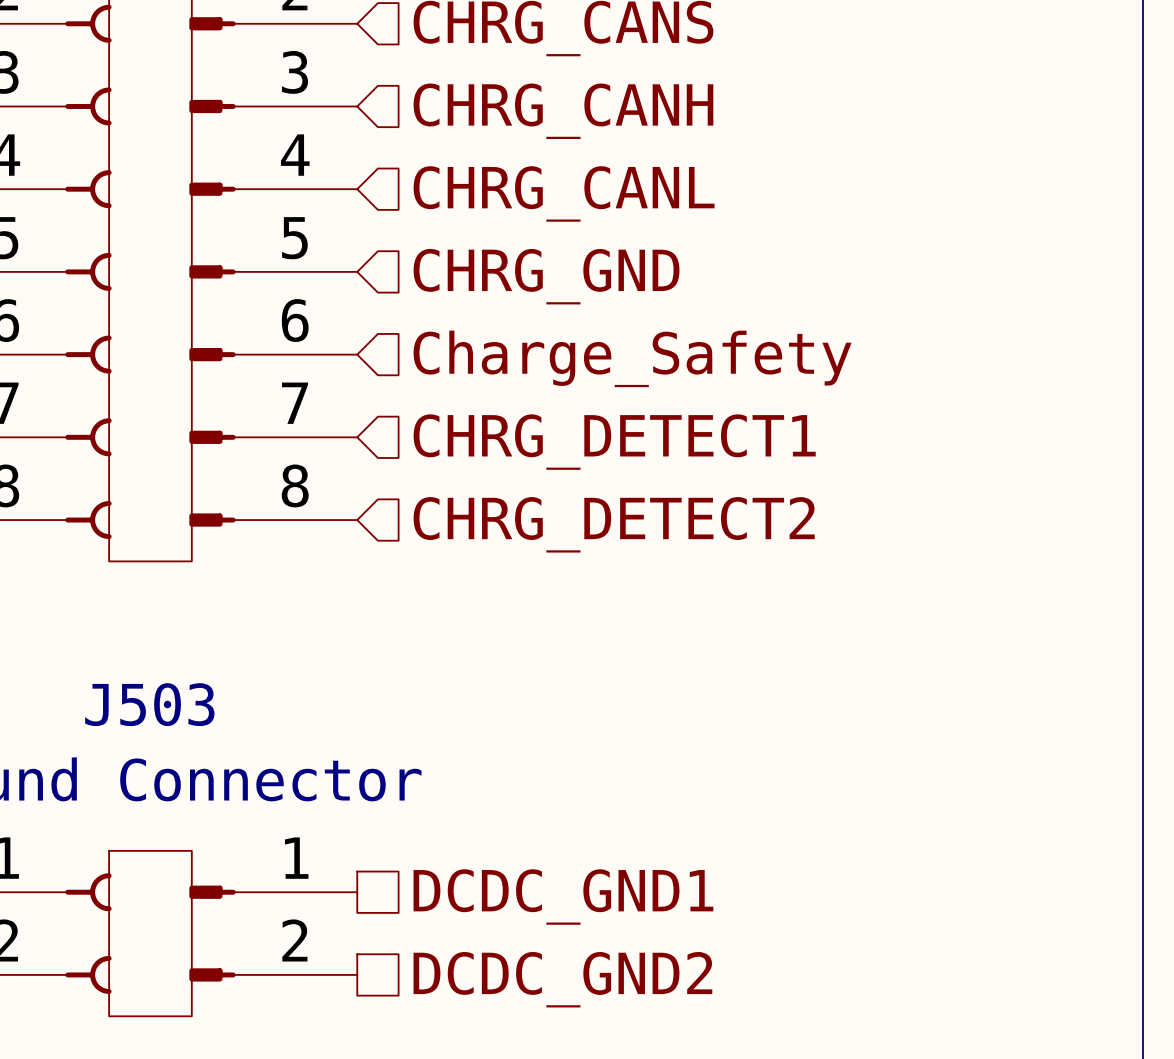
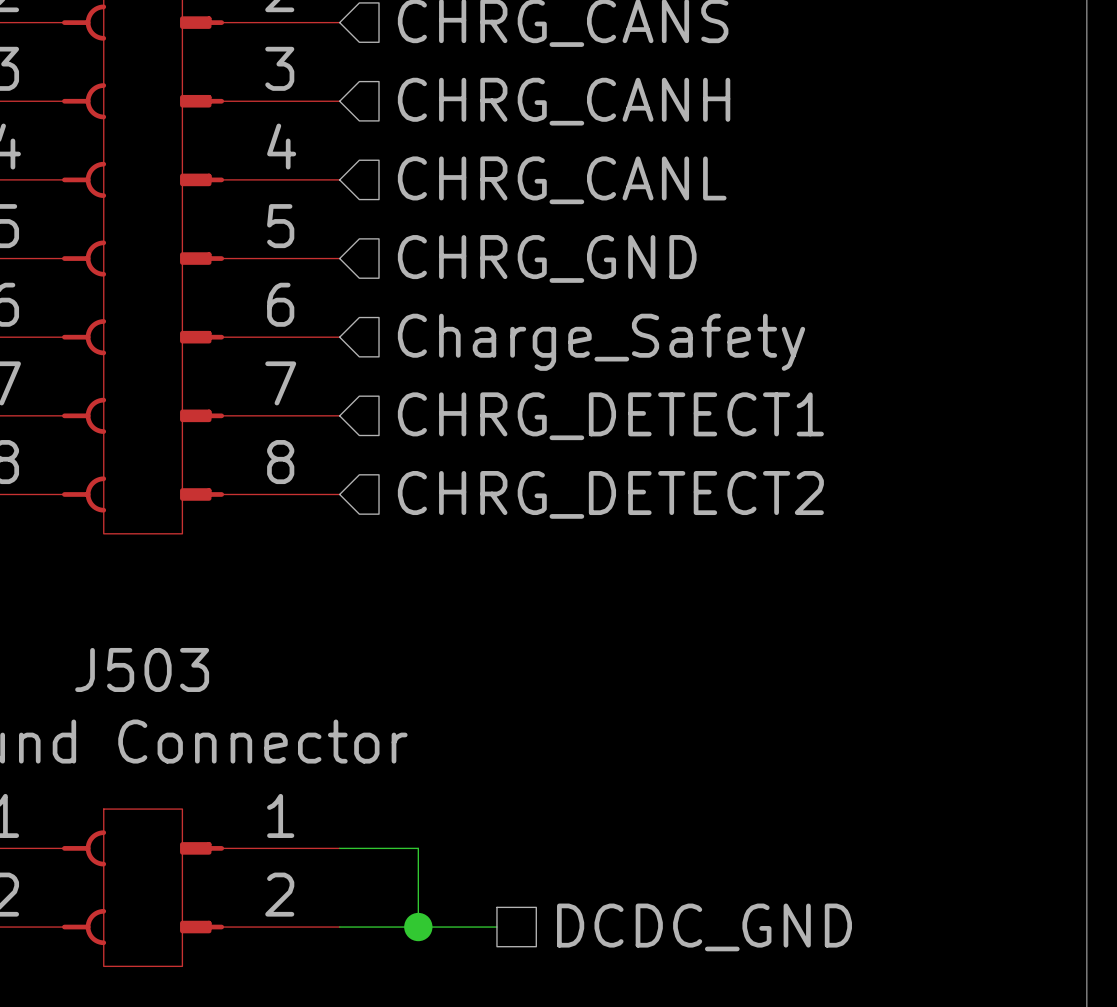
wire: none -> (339, 848) (418, 848) (418, 927)
hierarchical label: DCDC_GND1 (563, 897) -> none
wire: none -> (339, 927) (496, 927)
junction: none -> (418, 927)
hierarchical label: DCDC_GND2 (562, 979) -> none
hierarchical label: none -> DCDC_GND (704, 927)

